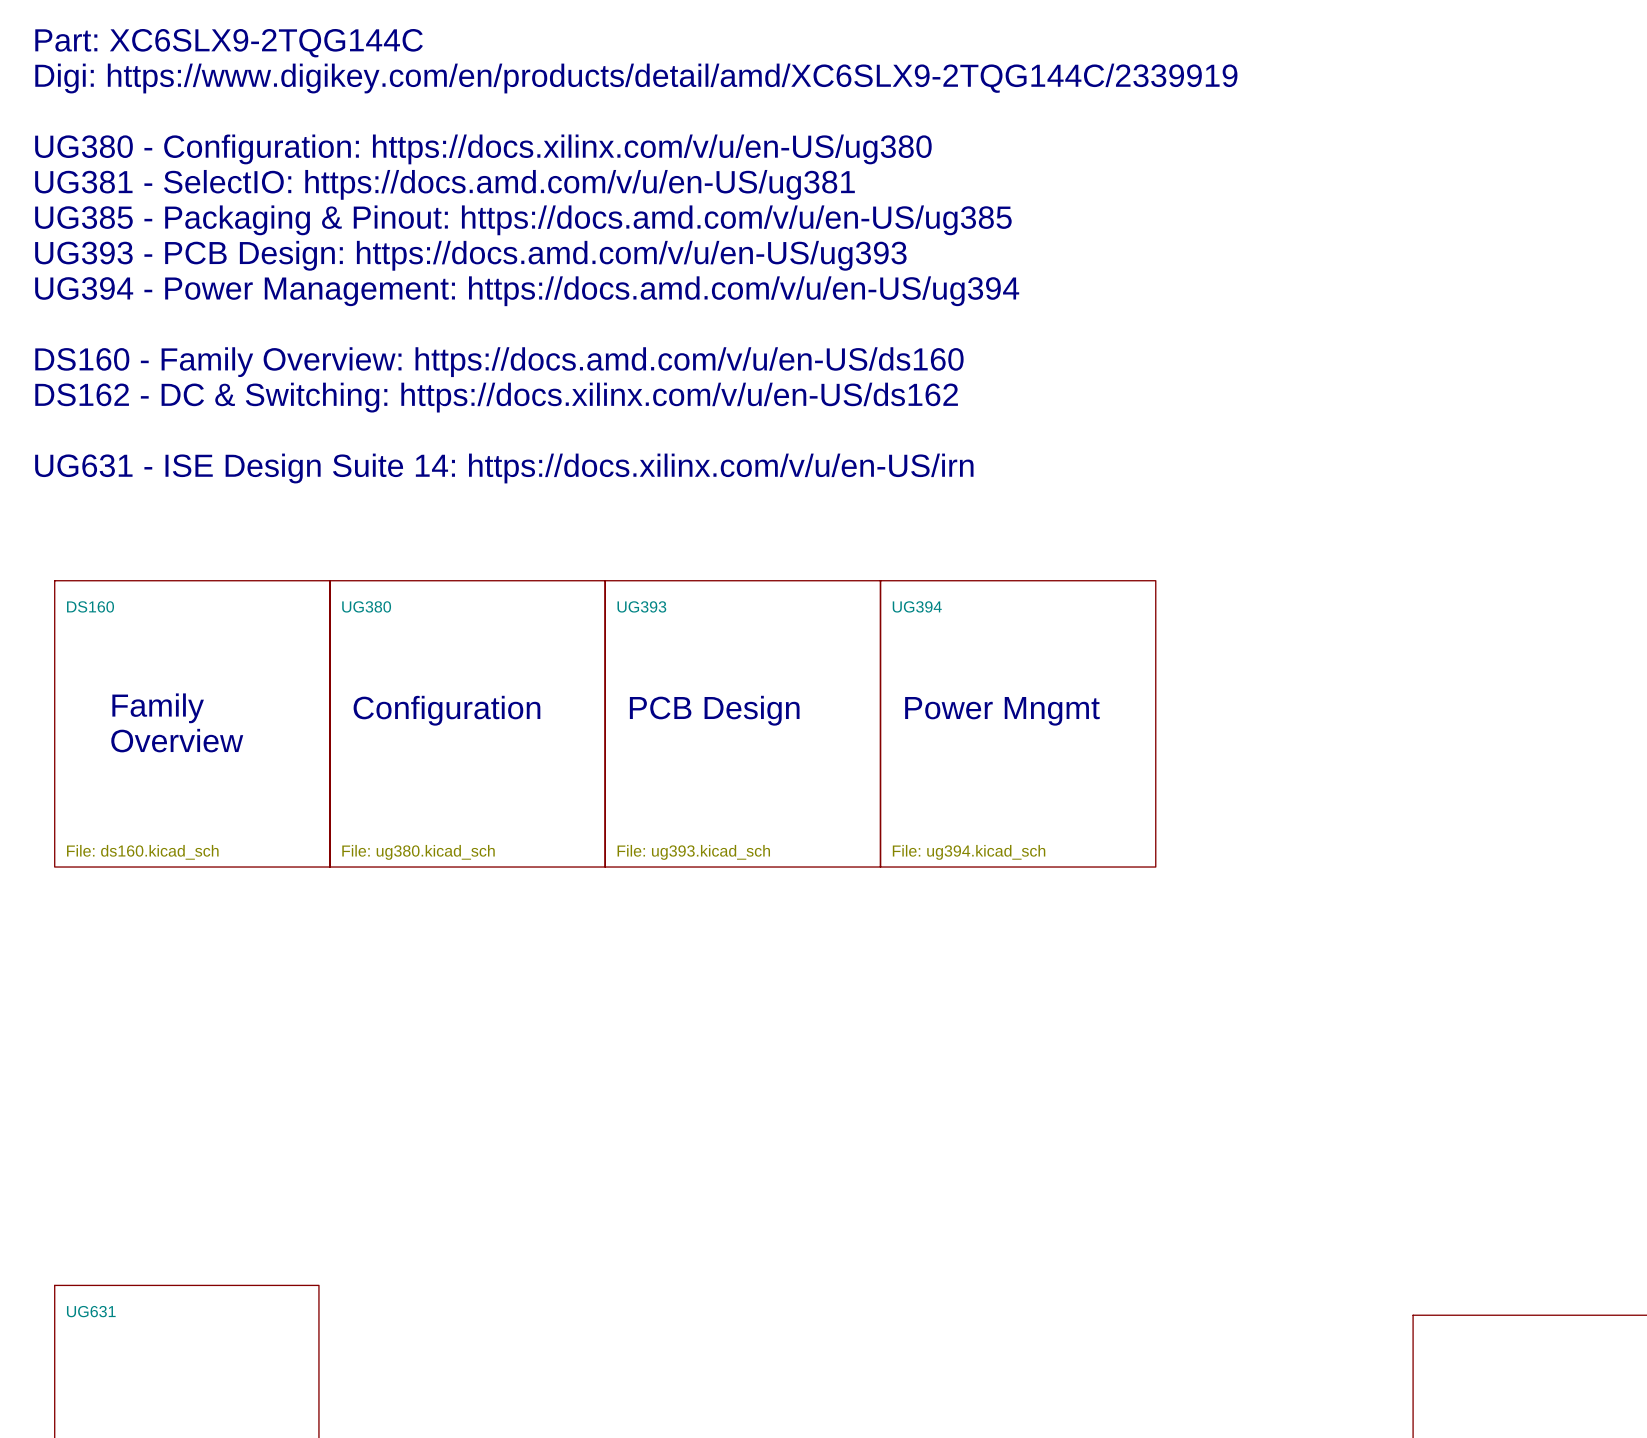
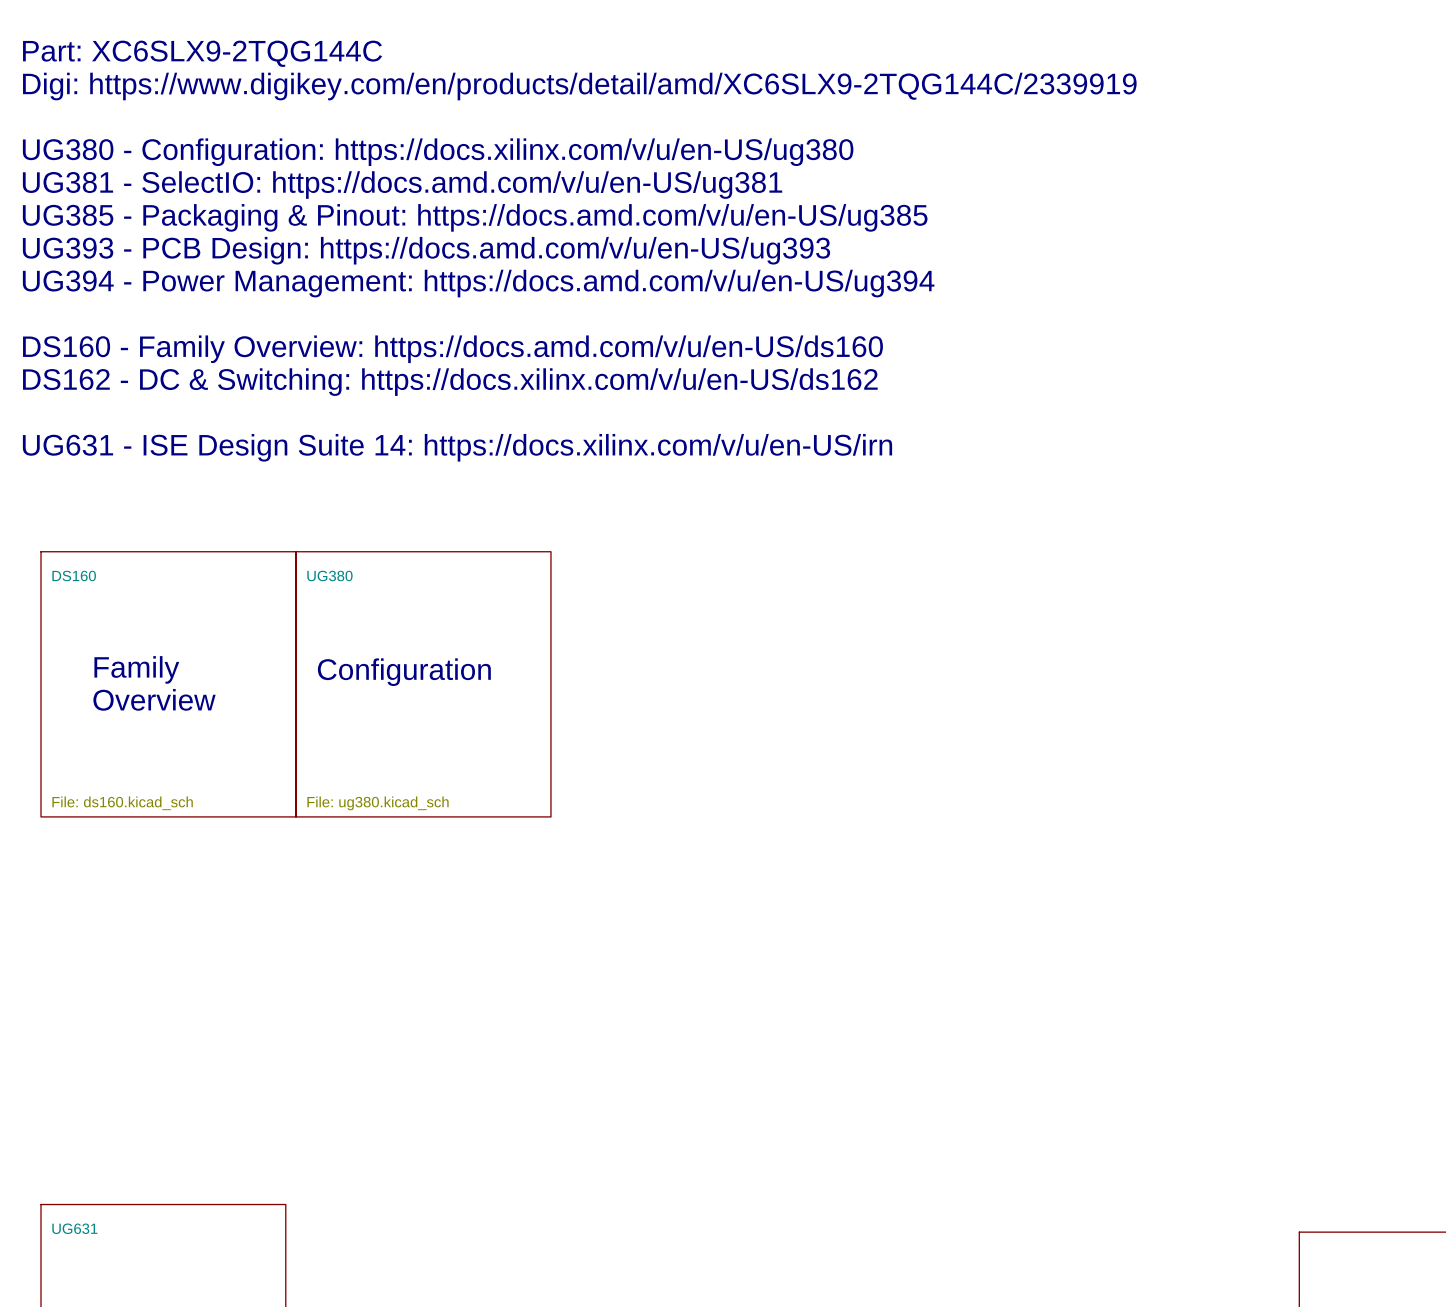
text: PCB Design (714, 710) -> none
text: Power Mngmt (1002, 711) -> none
sheet UG393: File: ug393.kicad_sch (742, 723) -> none
sheet UG394: File: ug394.kicad_sch (1018, 723) -> none

